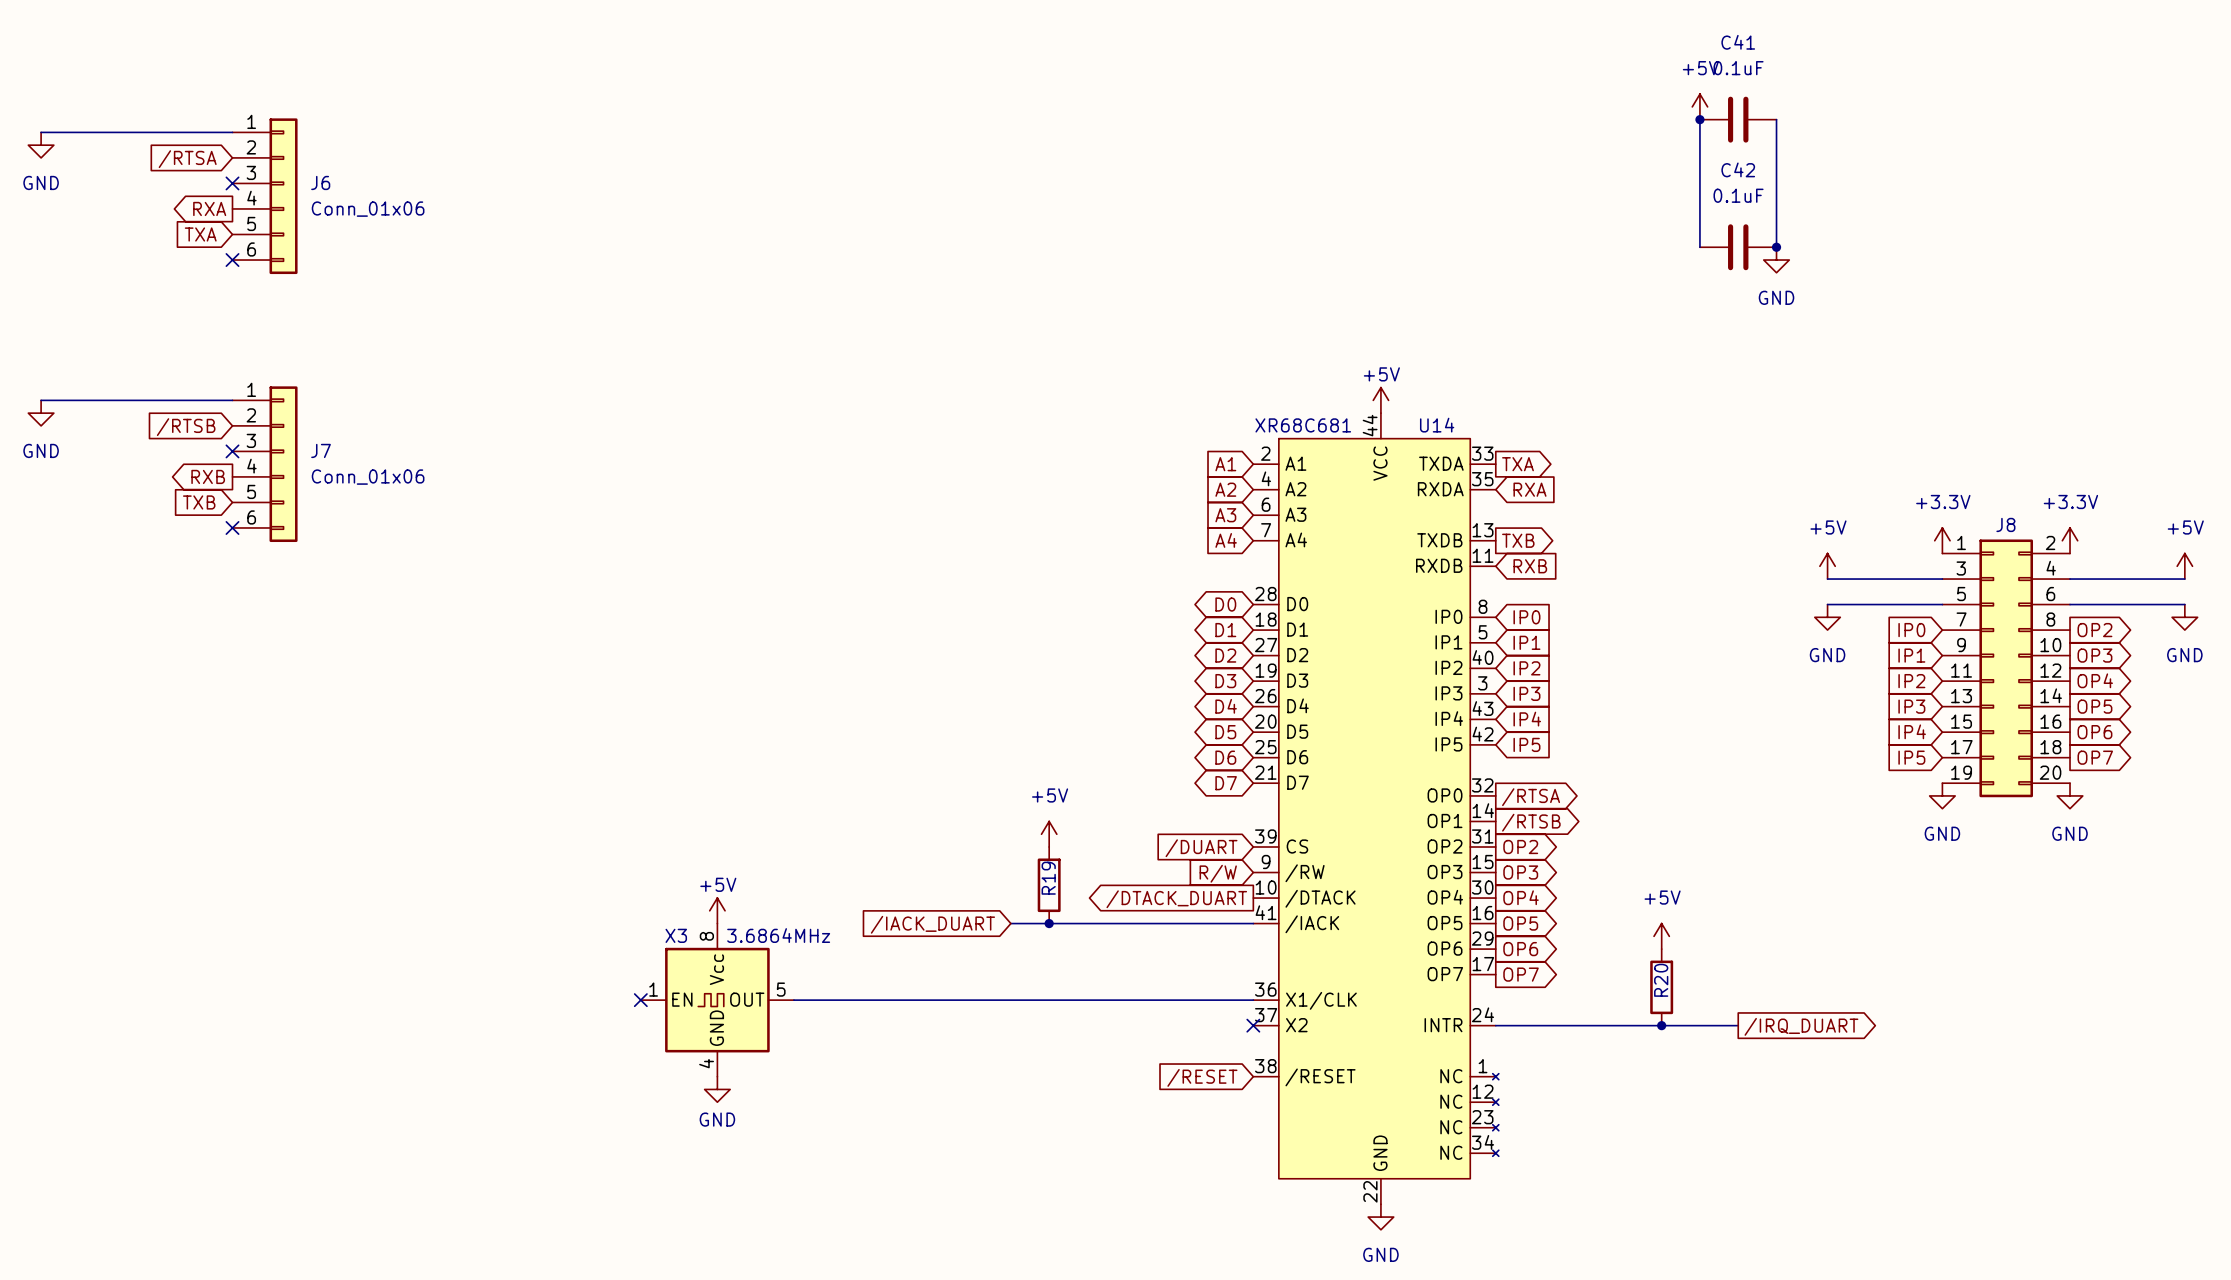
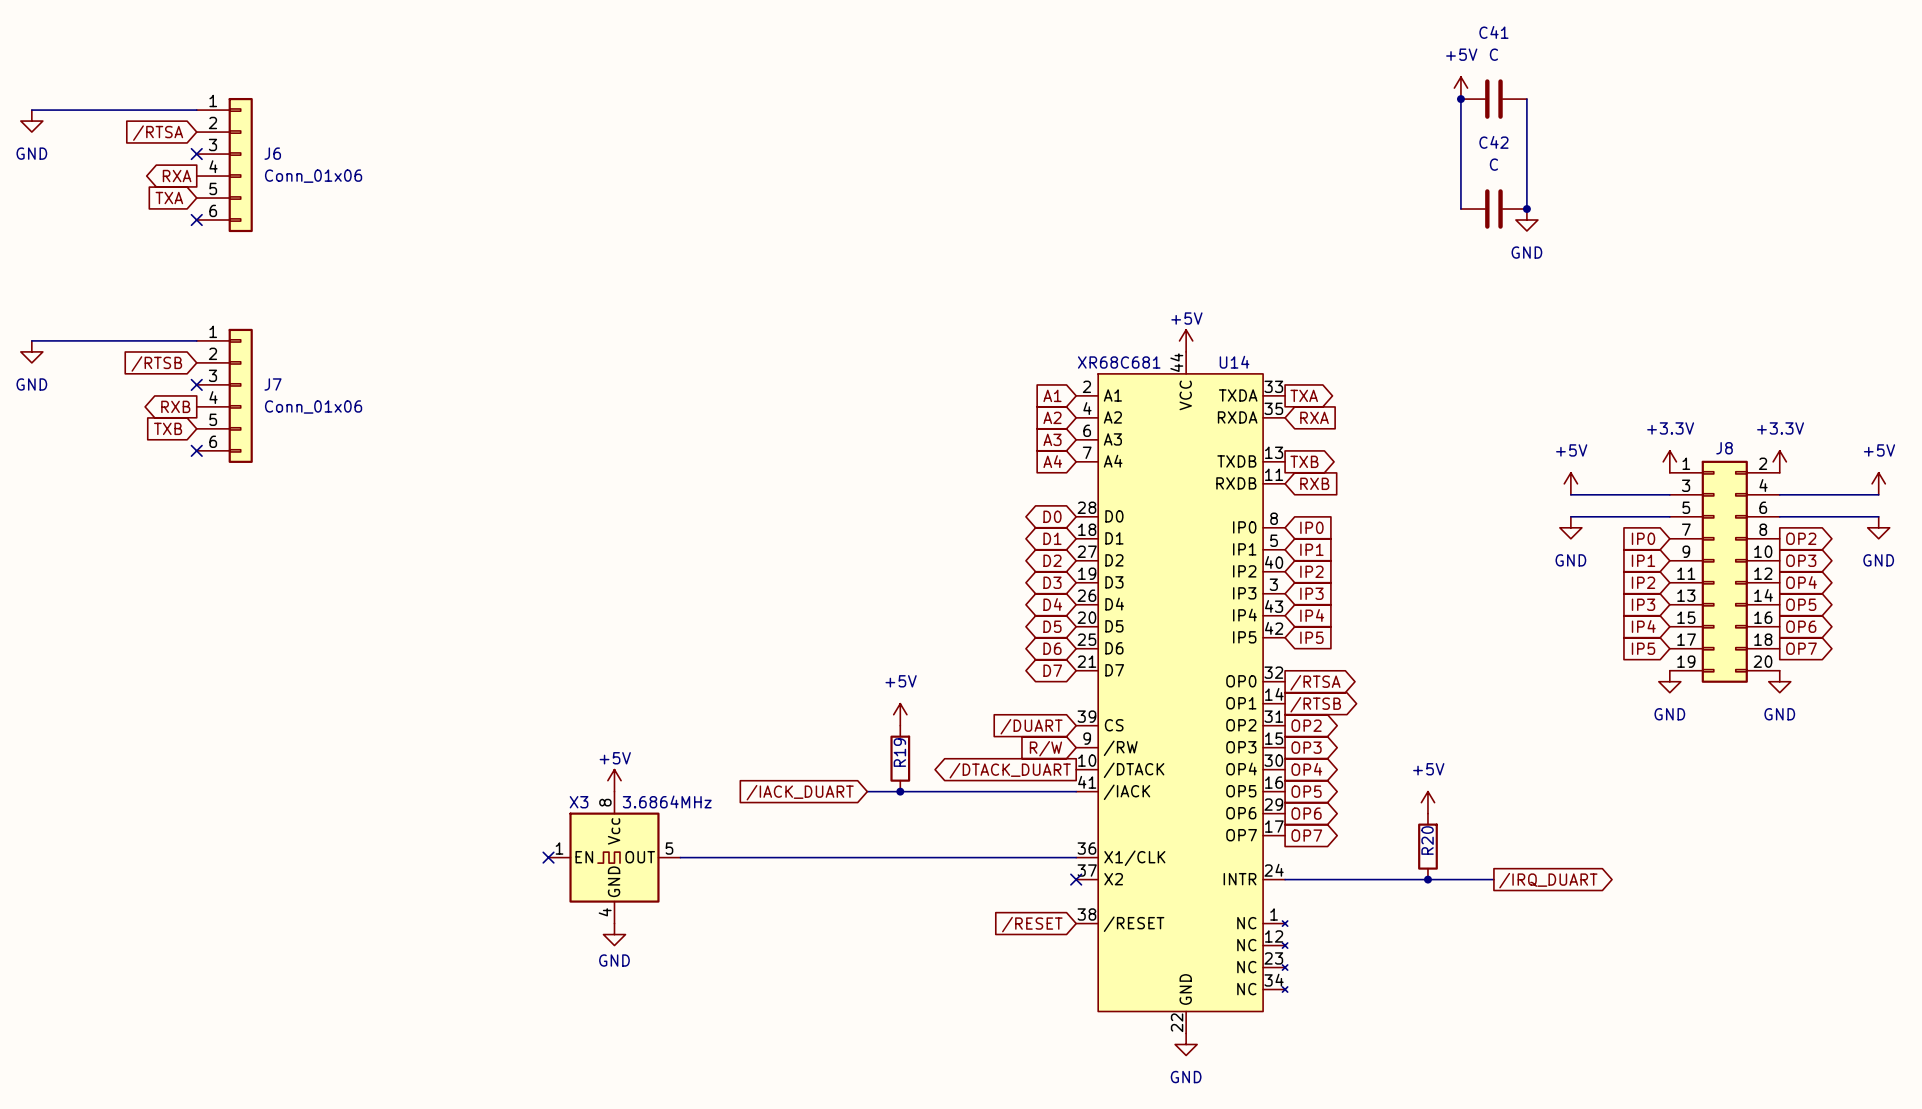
C41 value: 0.1uF (1738, 68) -> C (1493, 54)
C42 value: 0.1uF (1738, 195) -> C (1493, 164)

